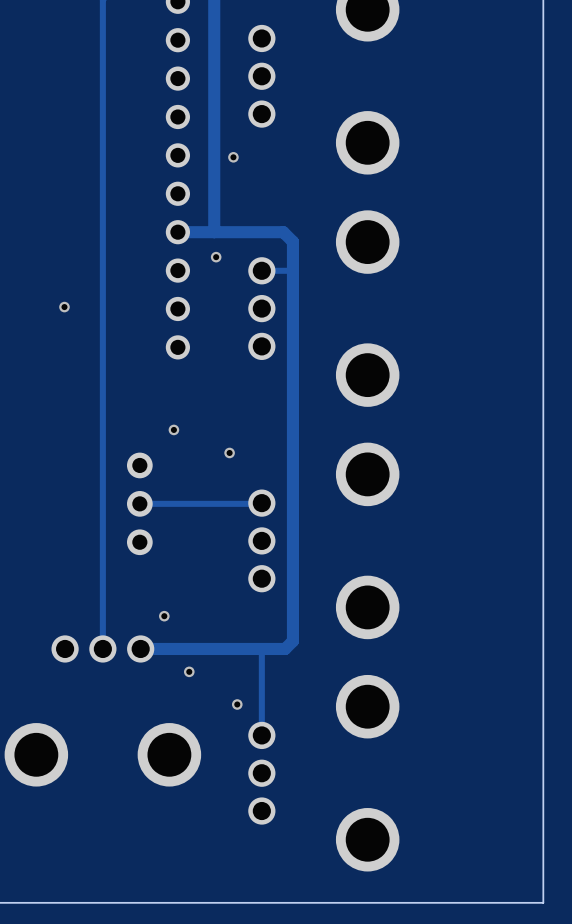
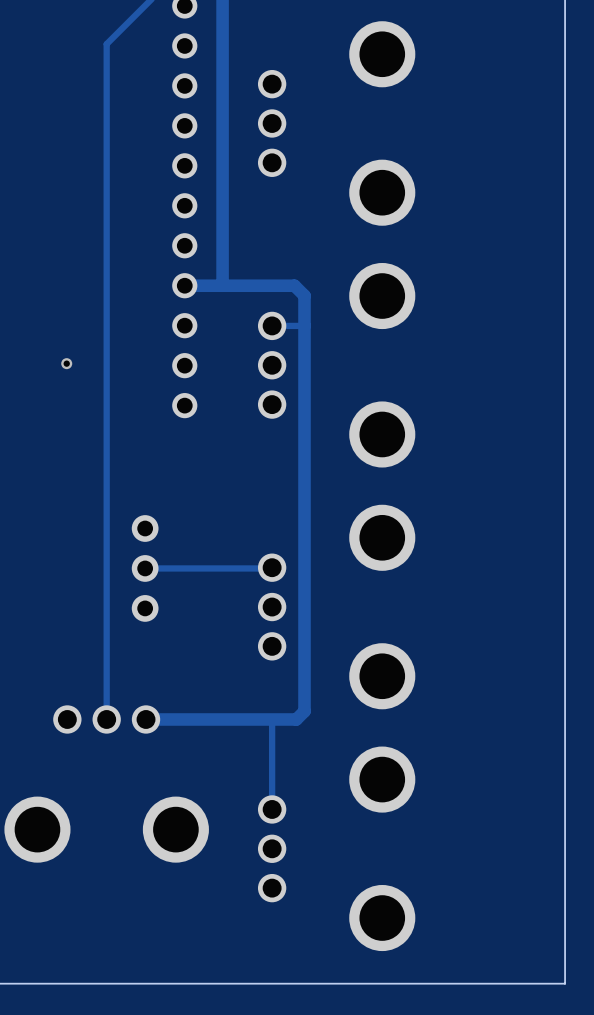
via: (233, 157) -> none
via: (216, 257) -> none
via: (173, 429) -> none
via: (229, 452) -> none
via: (164, 616) -> none
via: (189, 671) -> none
via: (237, 704) -> none

